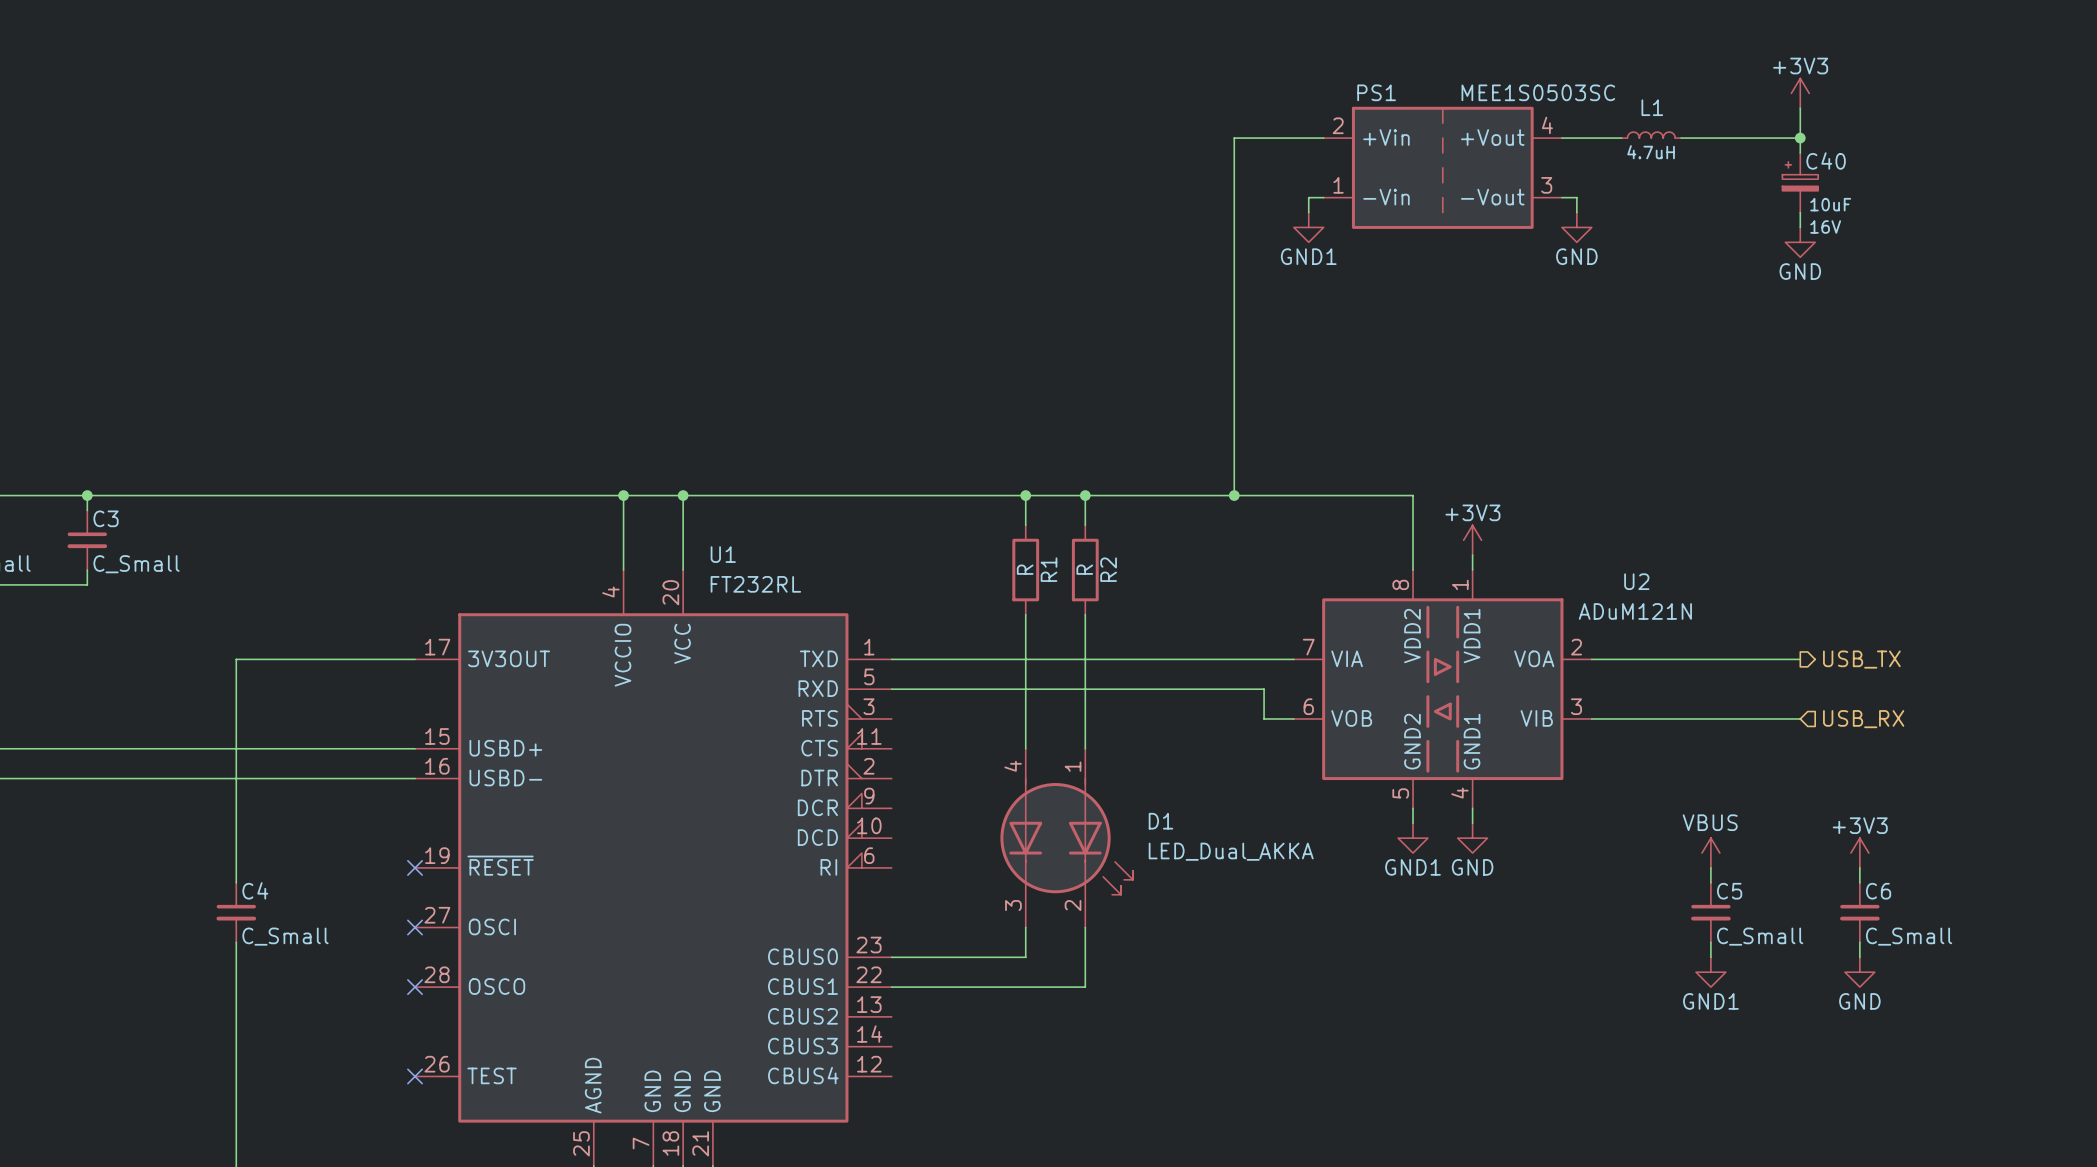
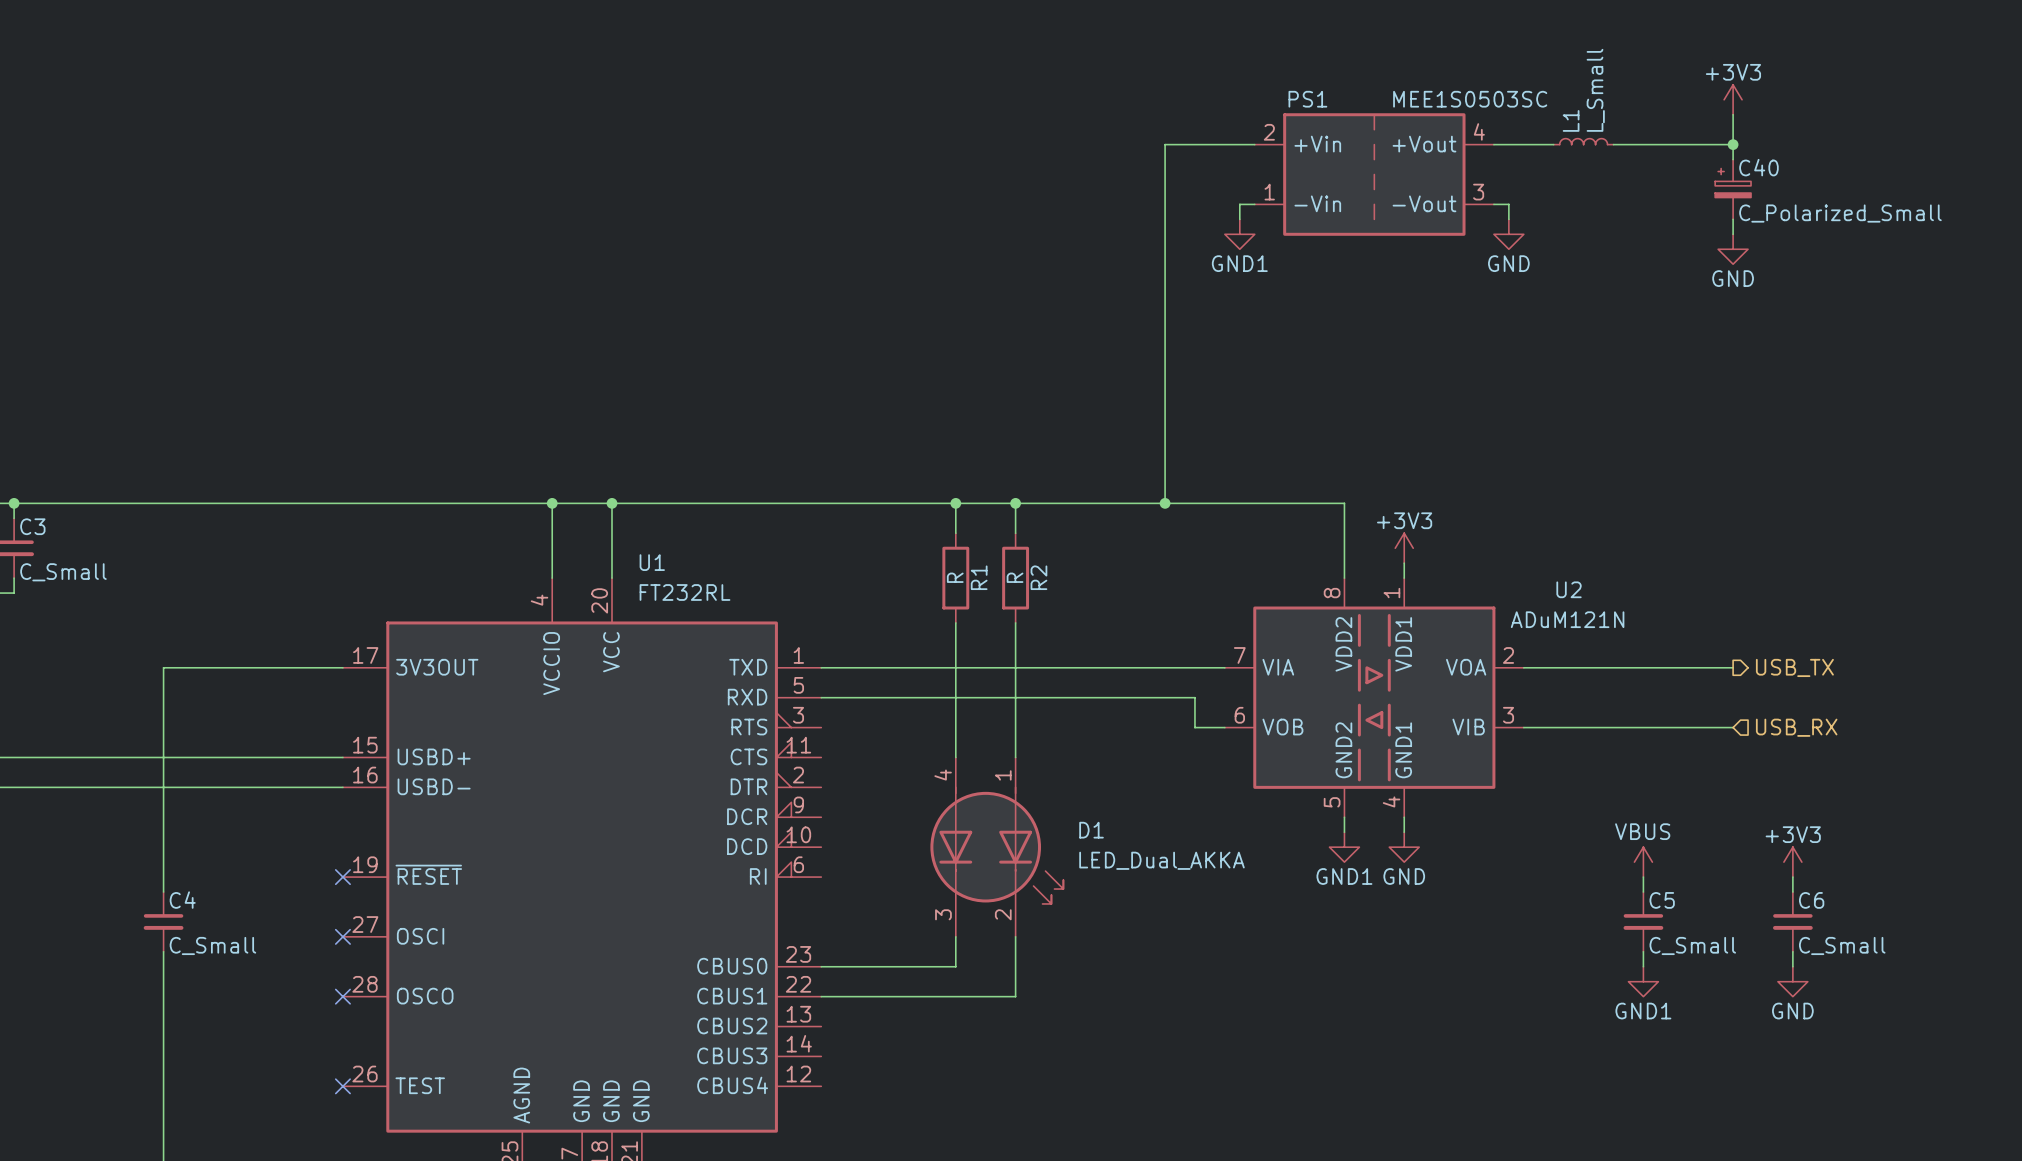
L1 value: none -> L_Small (1595, 90)
L1 name rotation: 0° (1652, 107) -> 90° counterclockwise (1571, 120)
L1 text: 4.7uH (1651, 152) -> none
C40 text: 10uF (1830, 204) -> none
C40 value: none -> C_Polarized_Small (1840, 213)
C40 text: 16V (1825, 227) -> none

